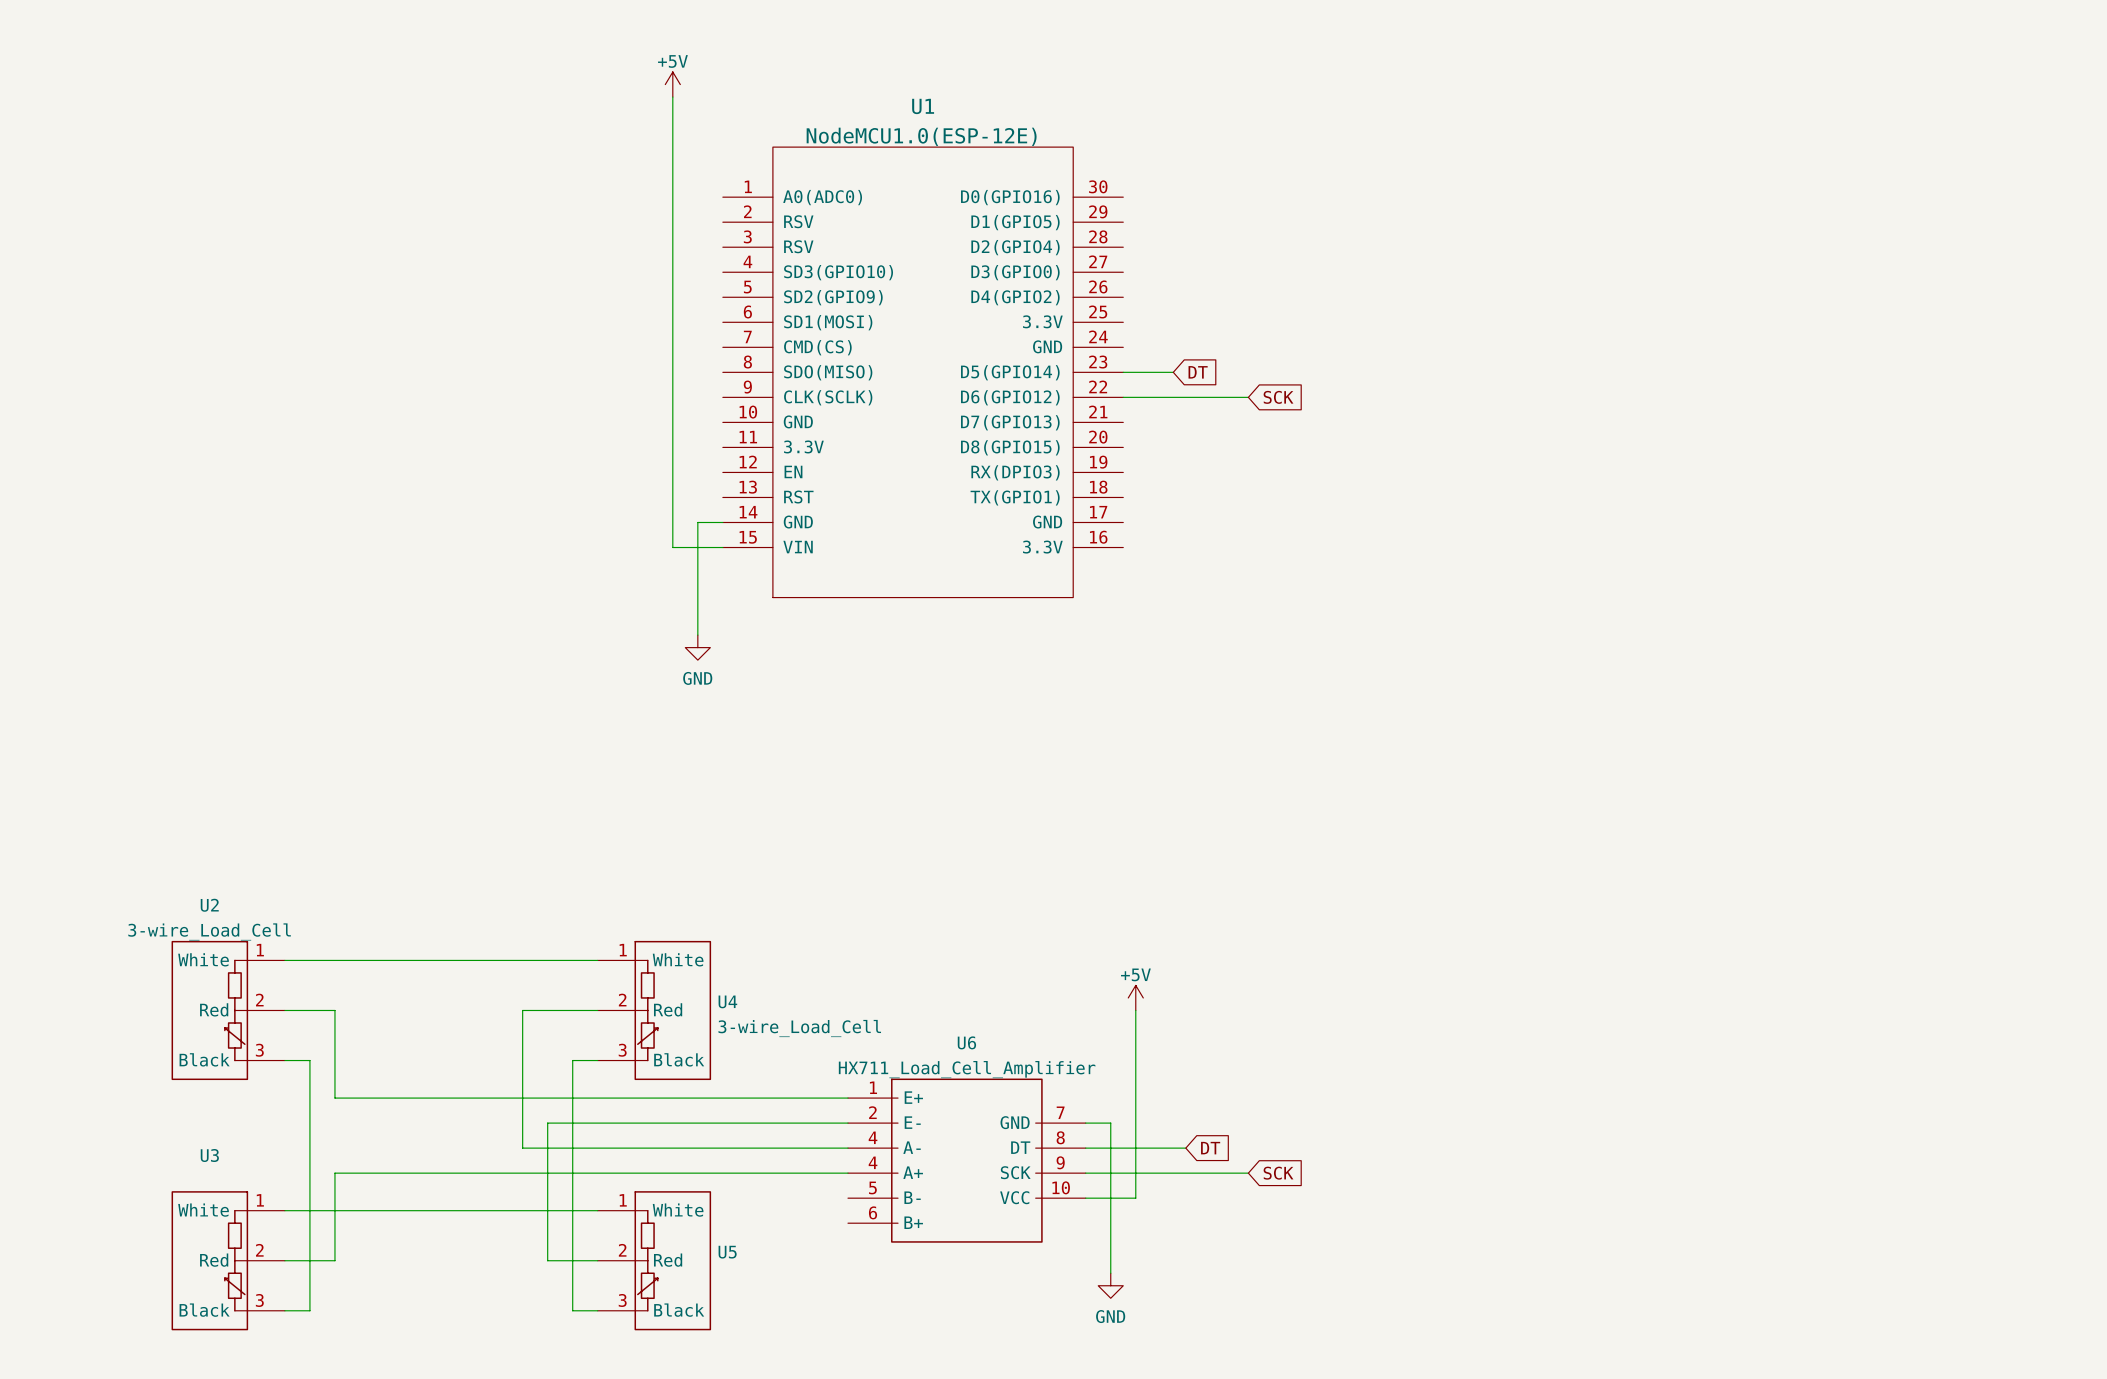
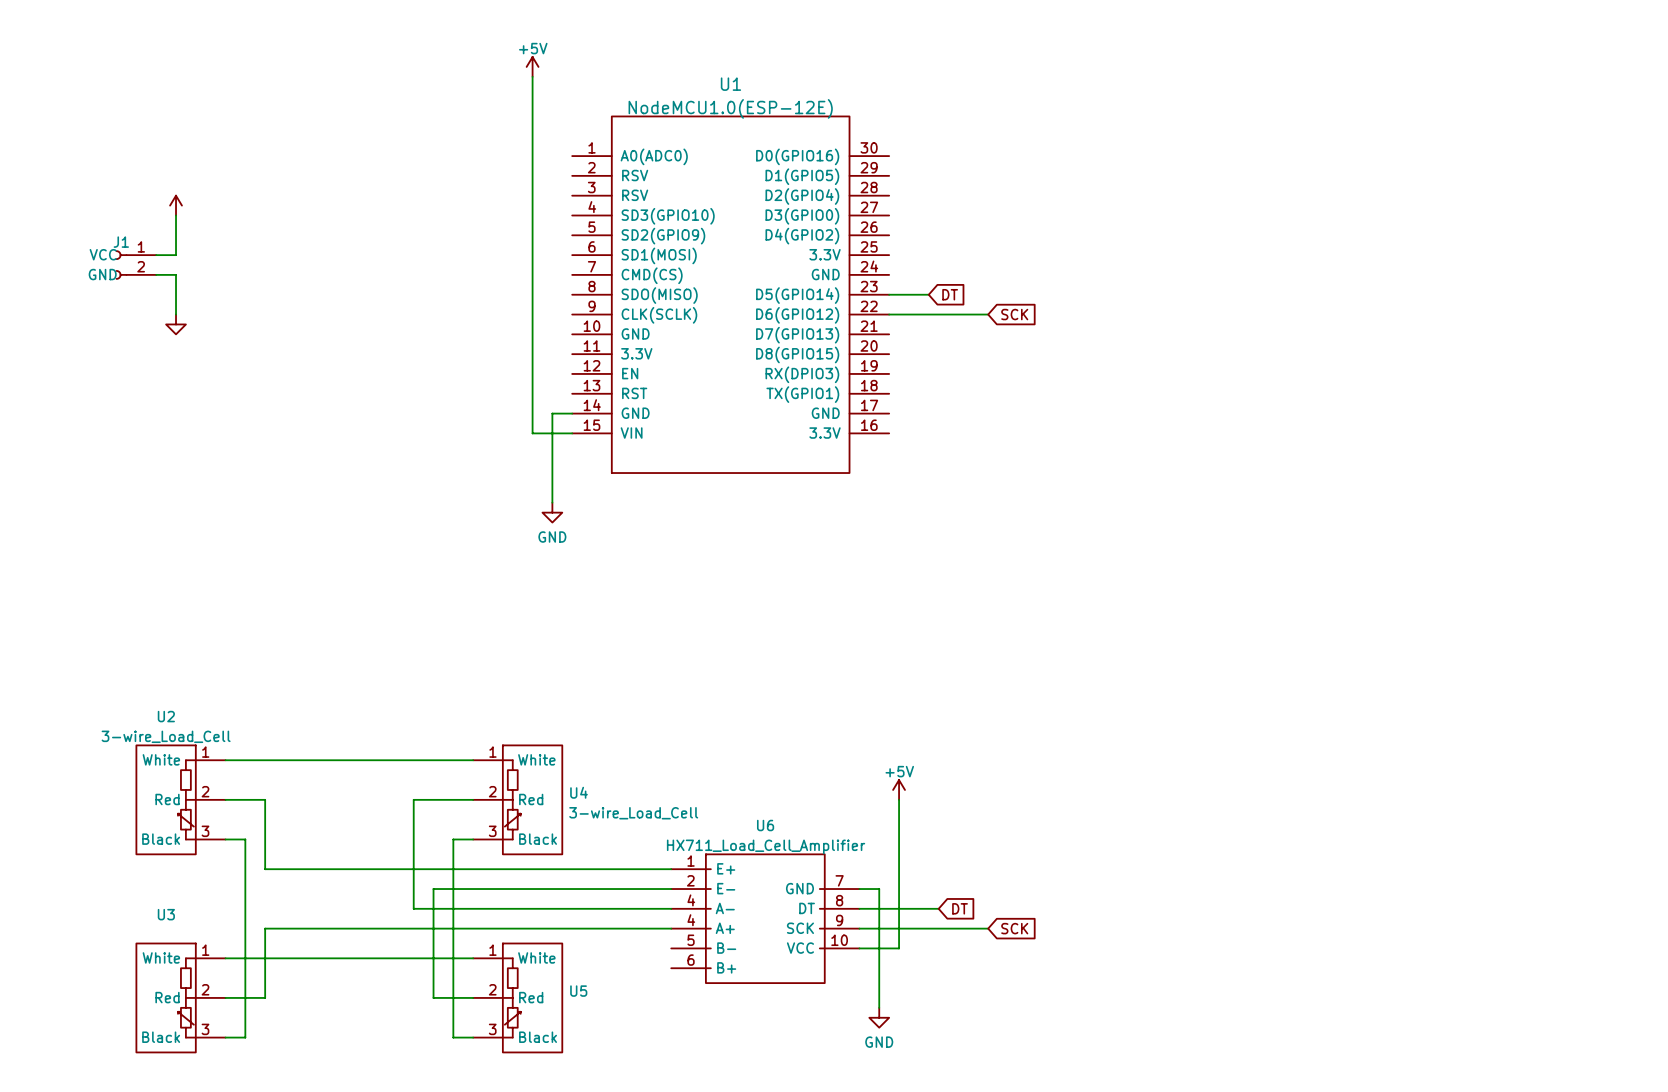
power symbol: none -> (176, 205)
wire: none -> (176, 215) (176, 255) (156, 255)
J1: none -> (136, 265)
wire: none -> (156, 274) (176, 274) (176, 314)
power symbol: none -> (176, 324)

